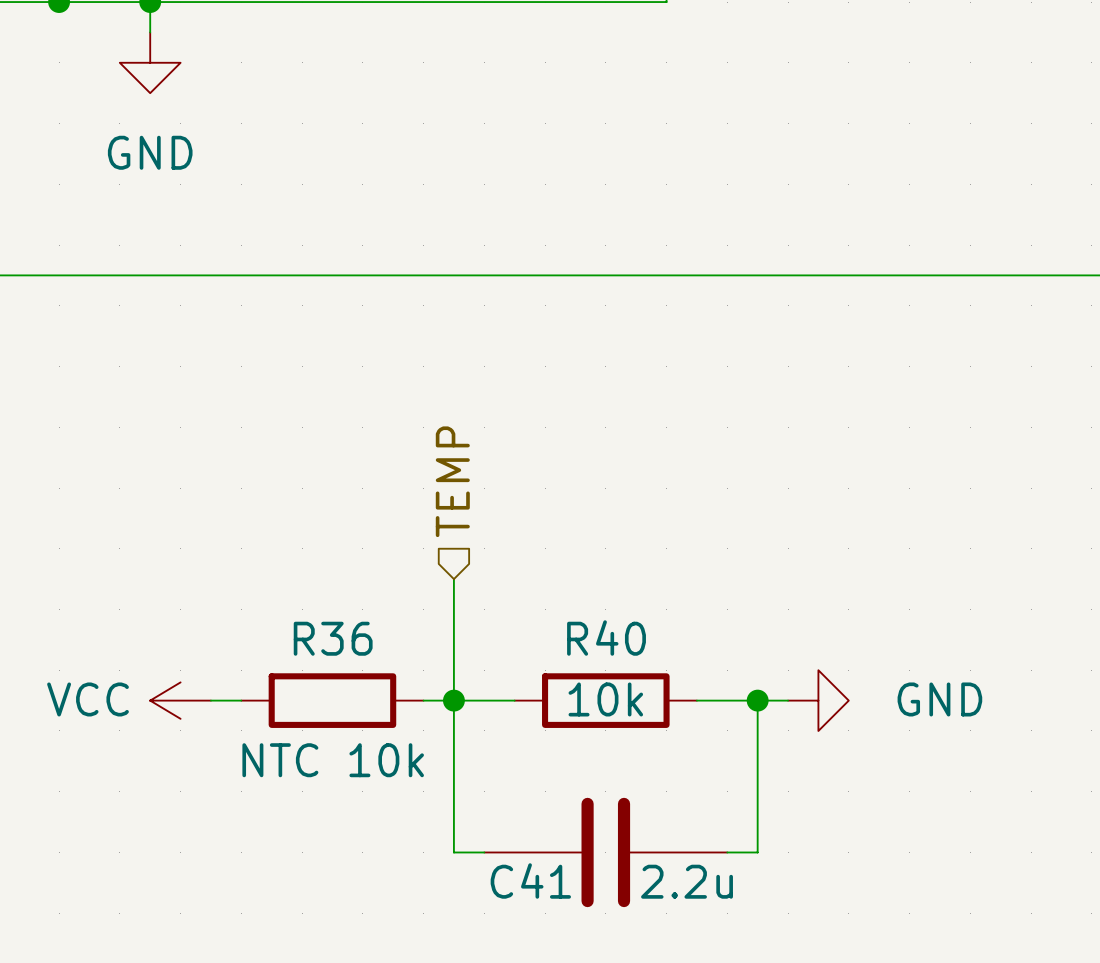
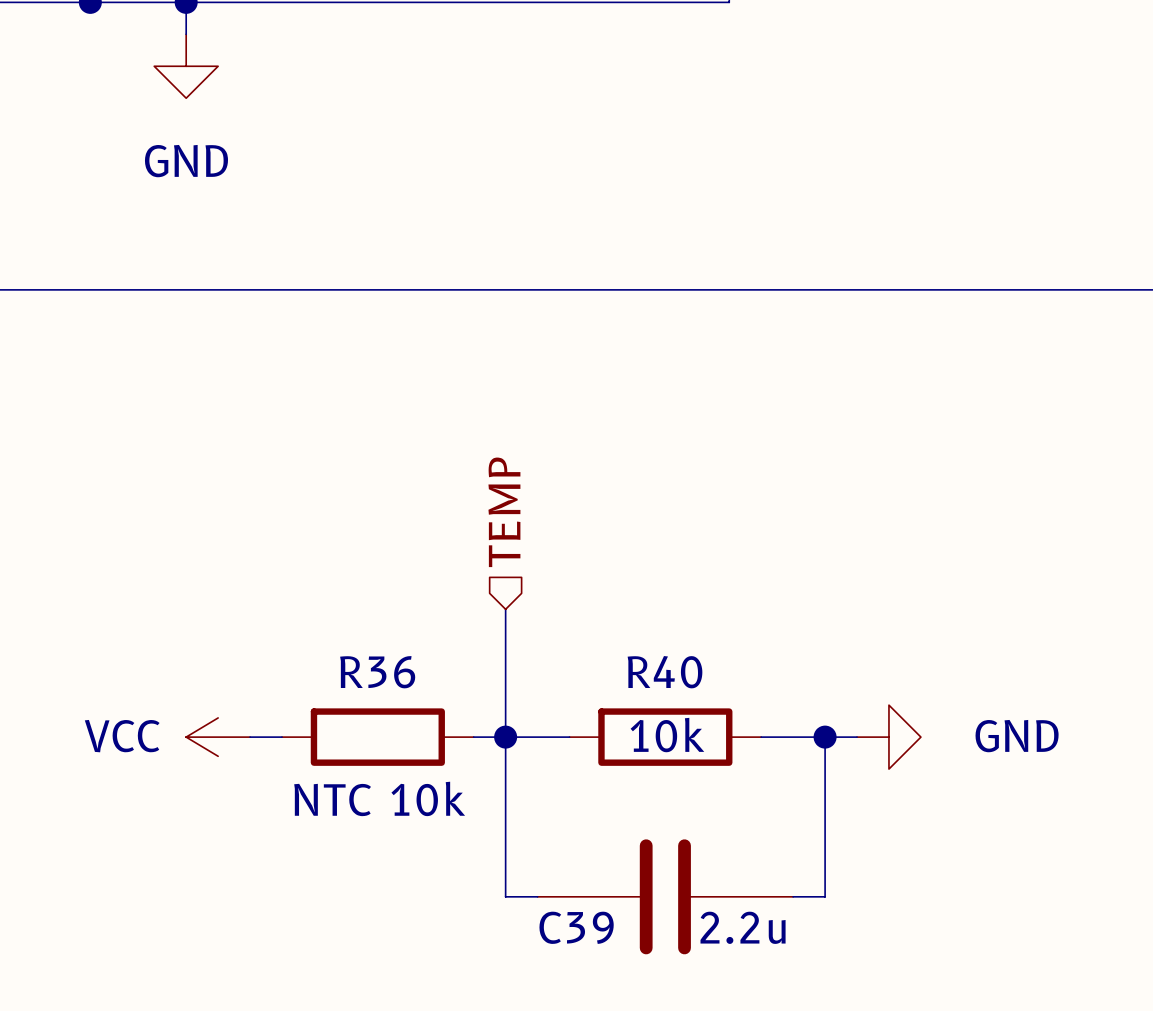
C41 name: C41 (530, 880) -> C39 (576, 927)

